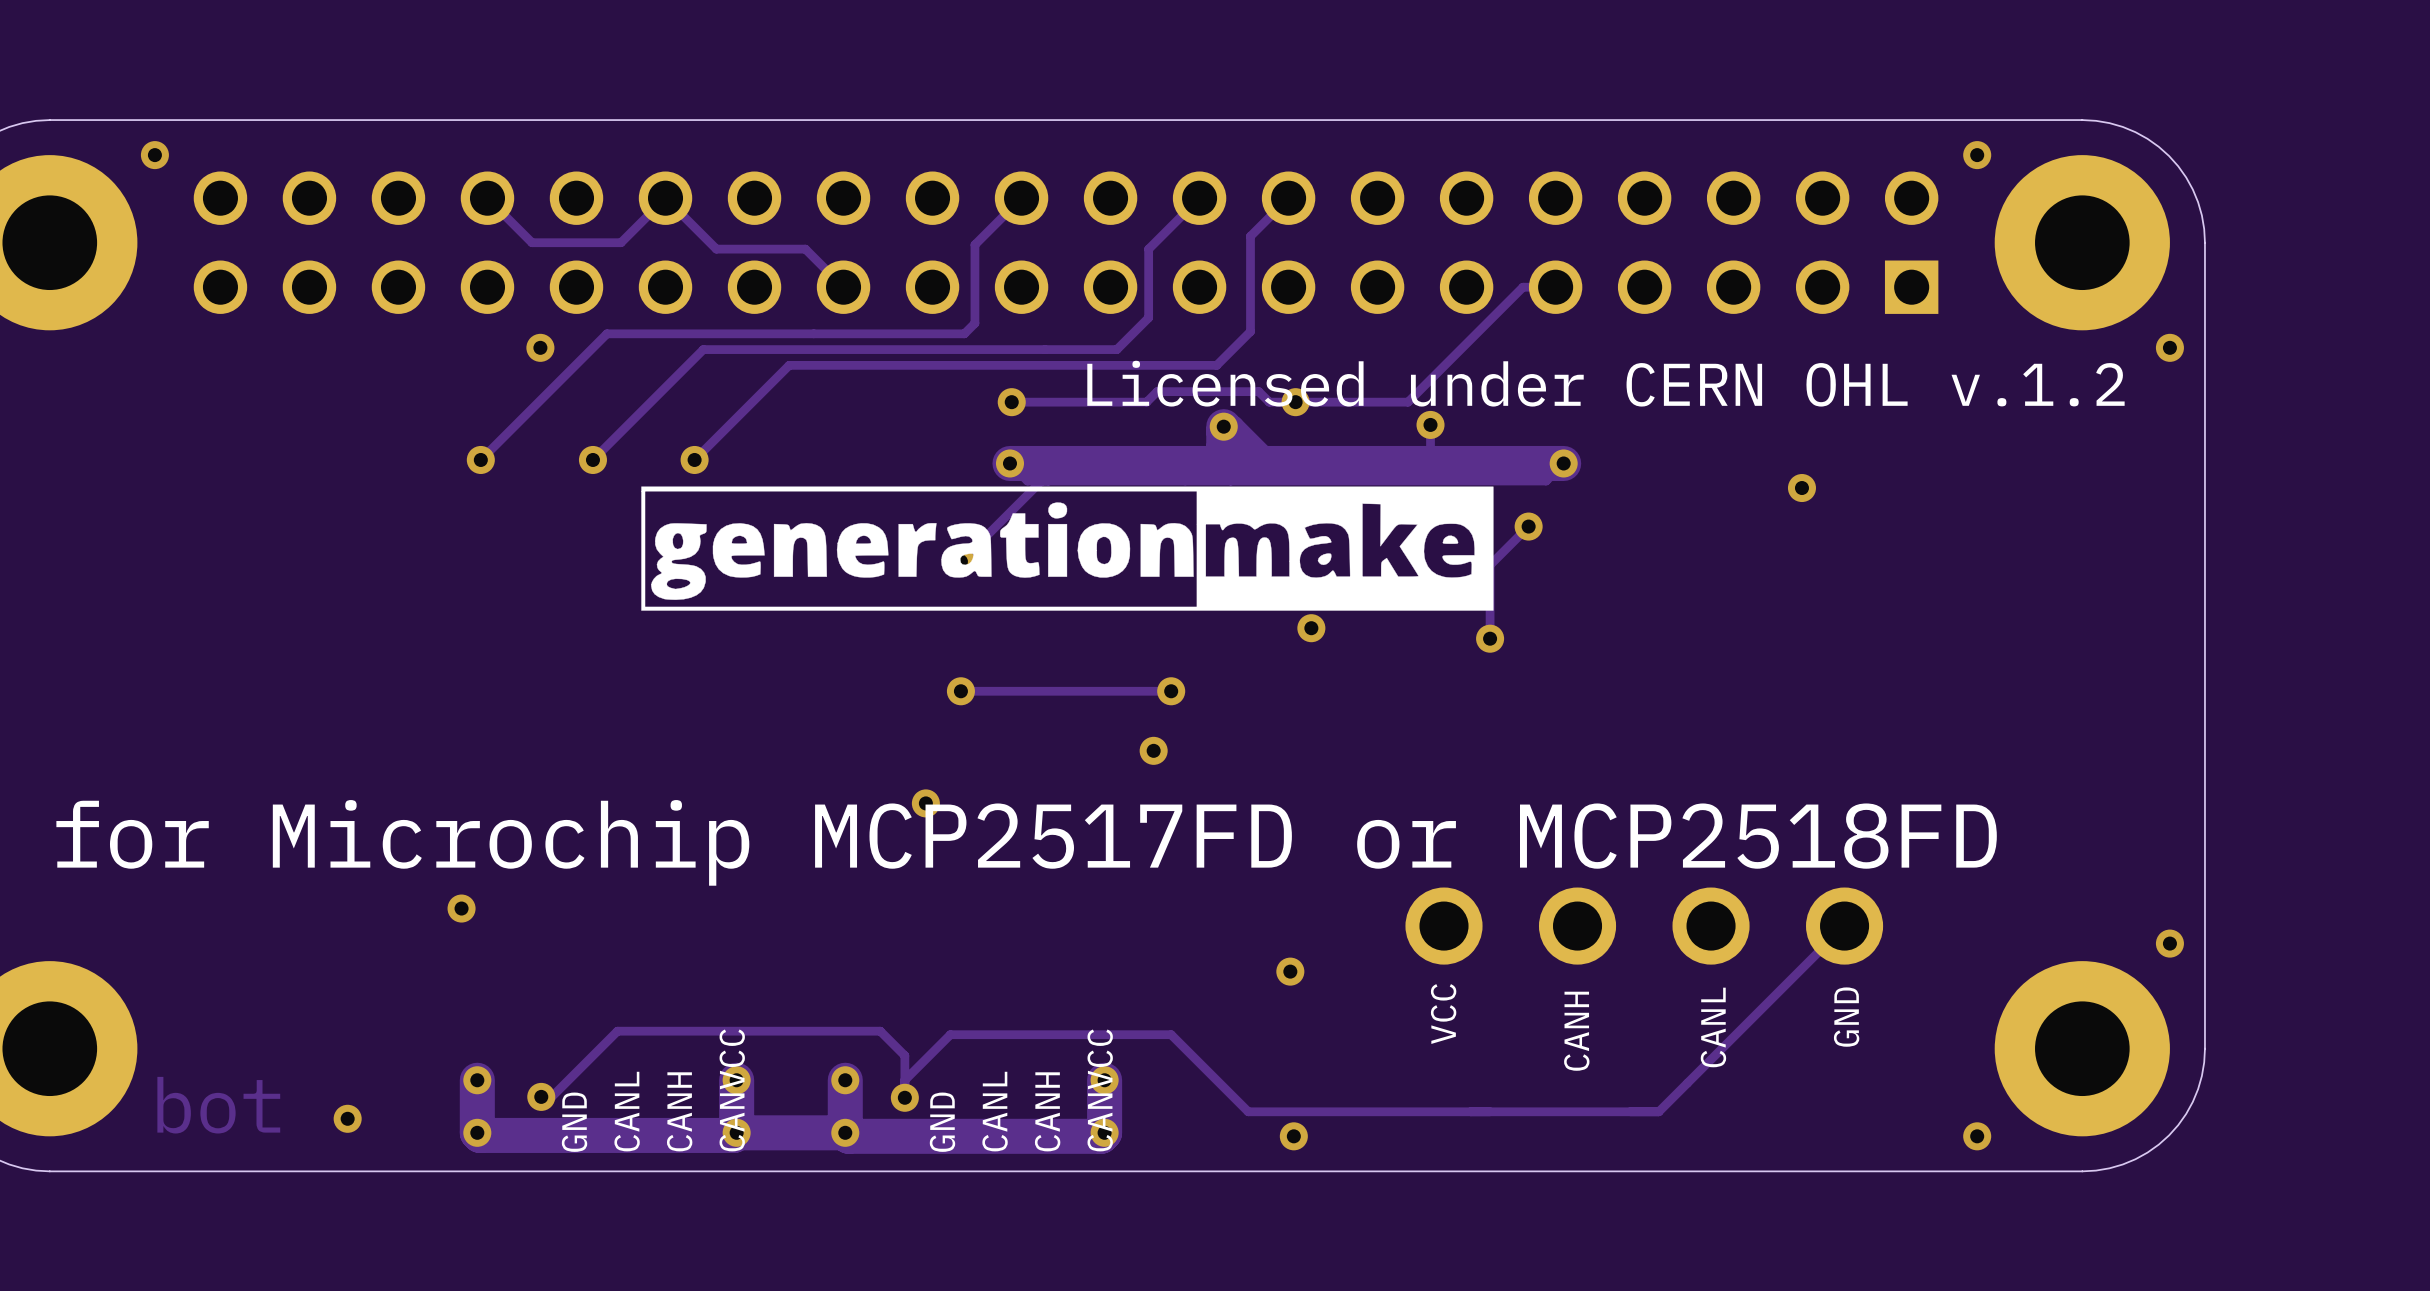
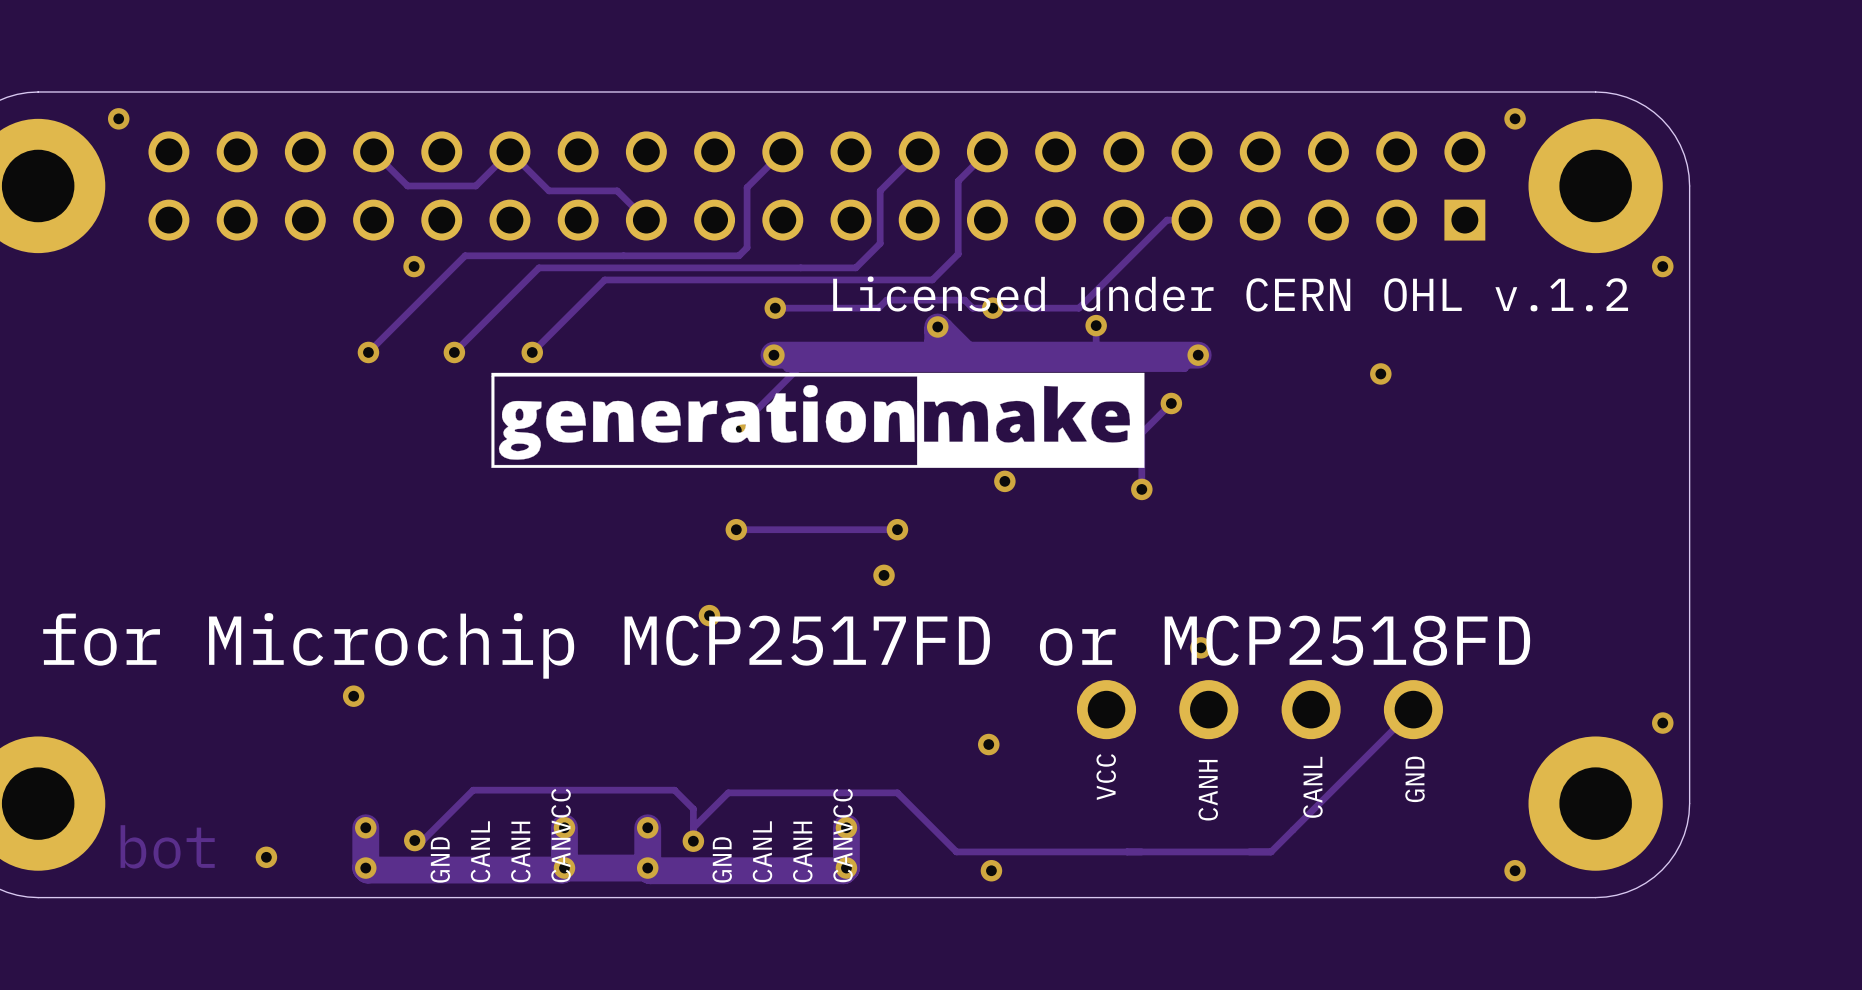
via: none -> (1200, 647)

